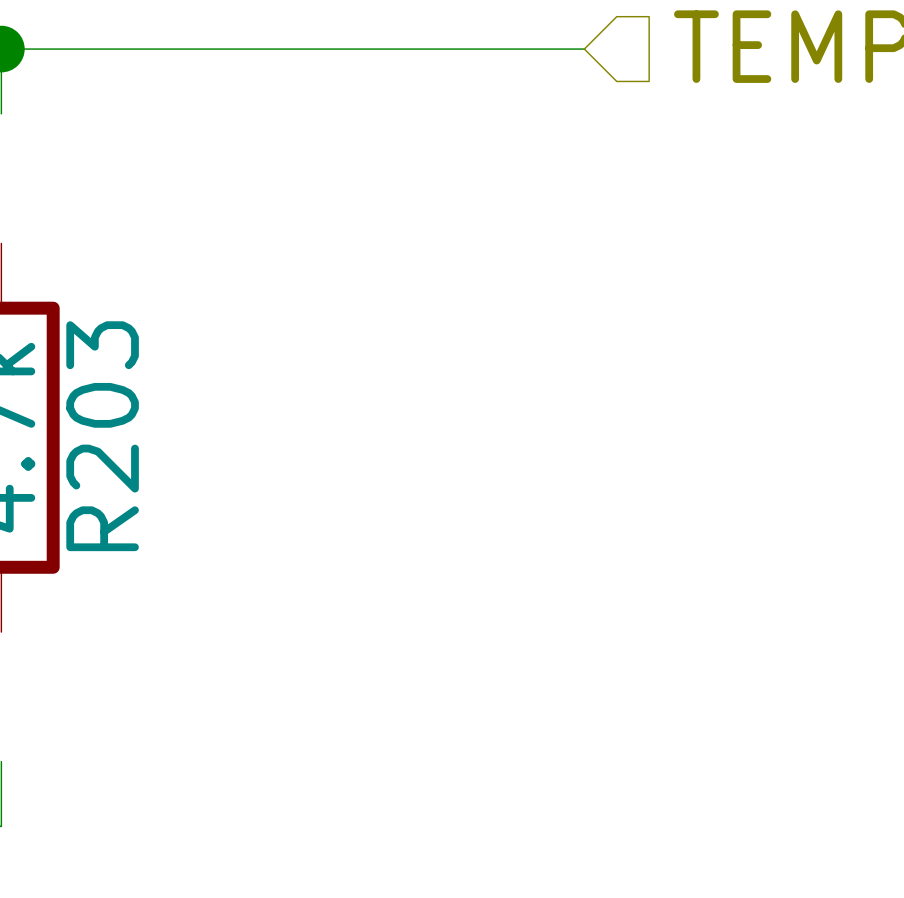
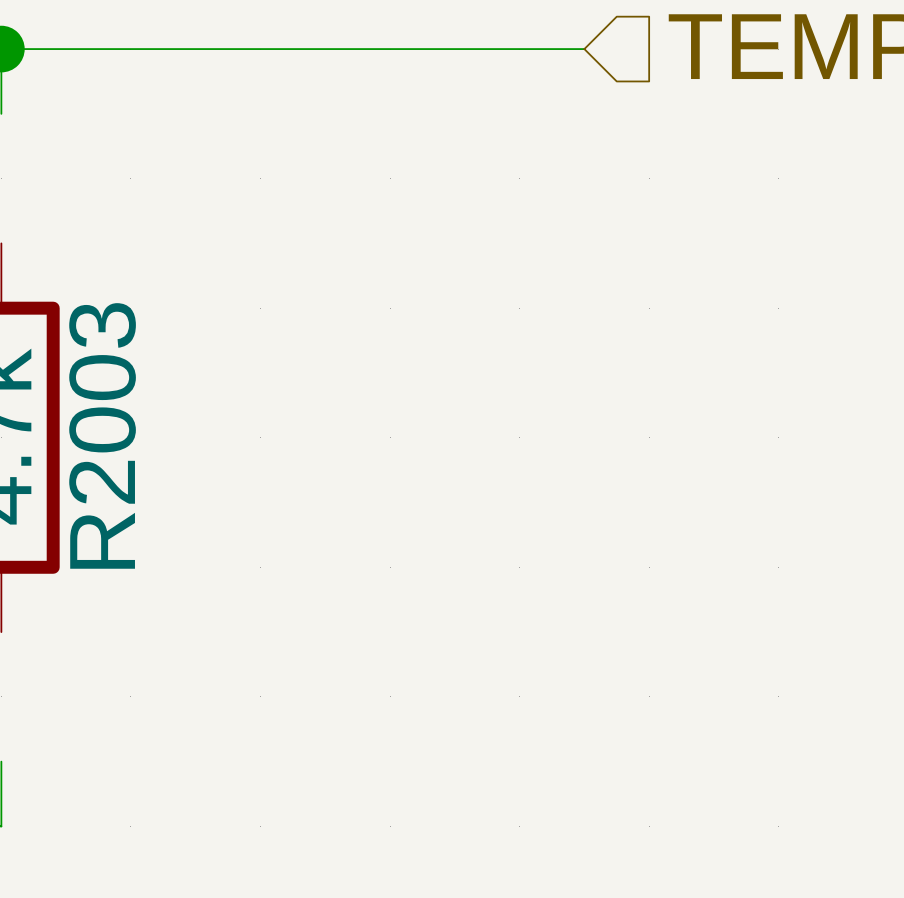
R203 name: R203 (102, 436) -> R2003 (102, 435)

